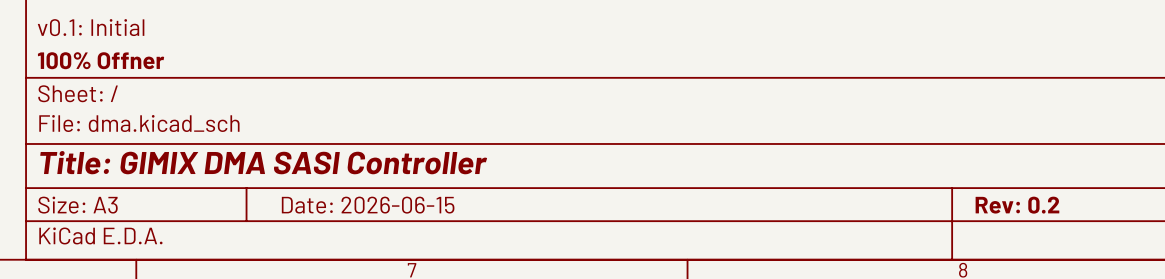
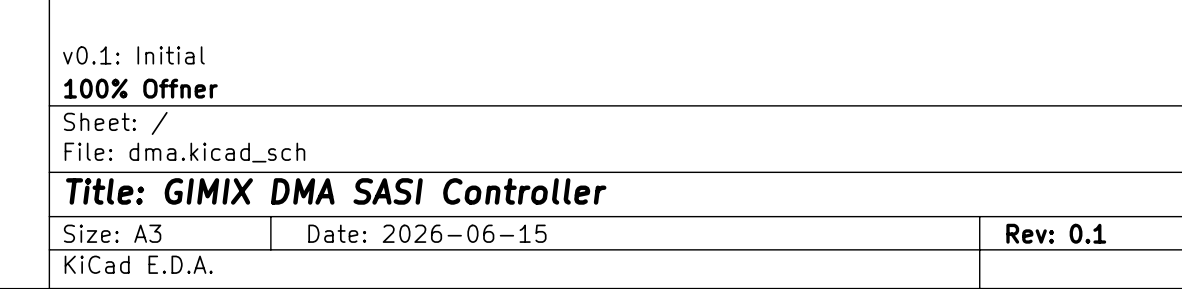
title block: Rev: 0.2 (1017, 205) -> Rev: 0.1 (1056, 233)

